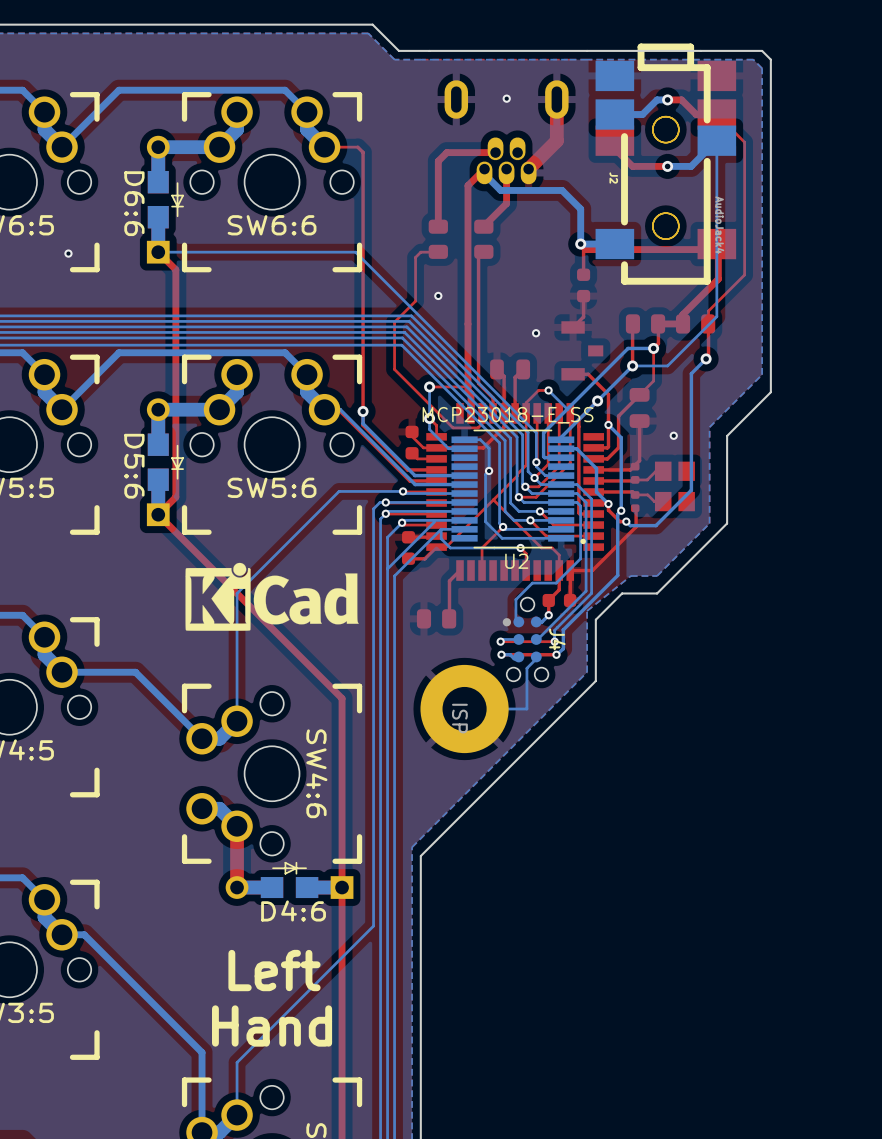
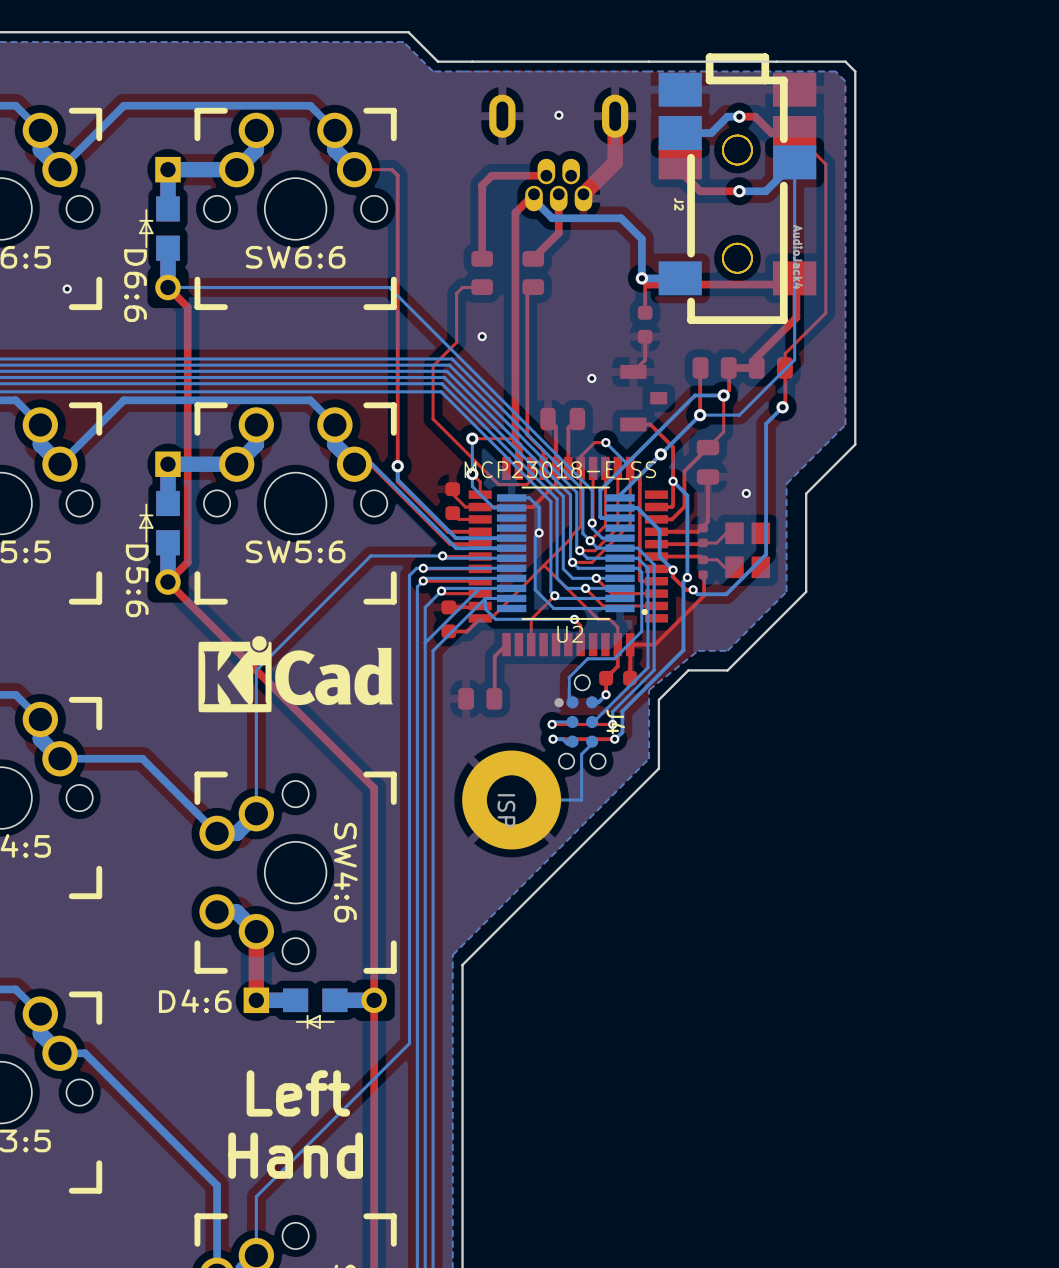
part: none -> (159, 228)
part: (165, 199) -> none
part: none -> (159, 523)
part: (165, 462) -> none
part: (289, 880) -> none
part: none -> (315, 1008)

